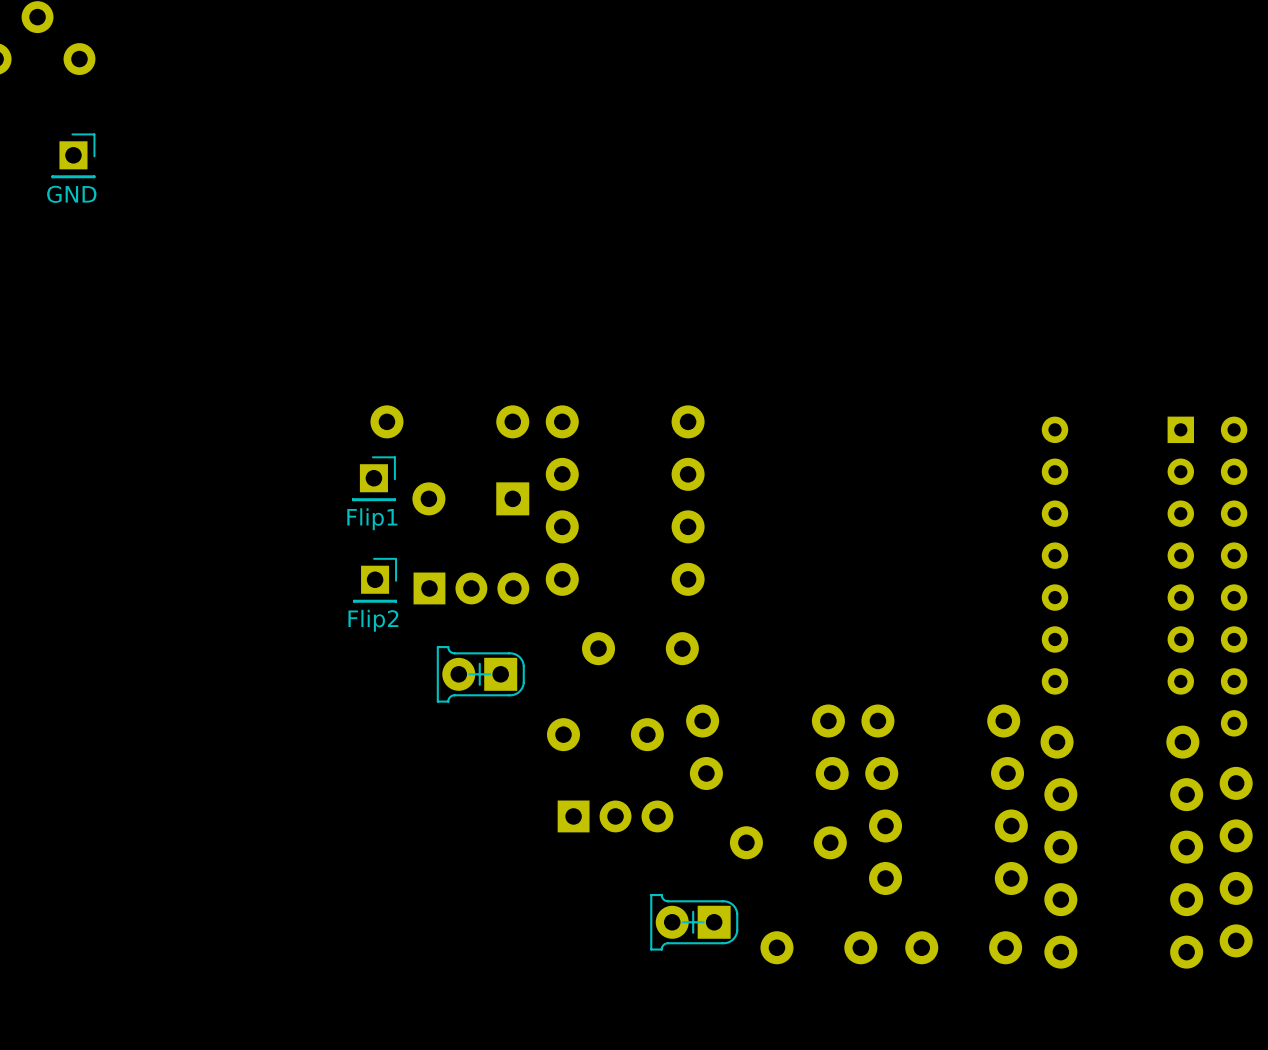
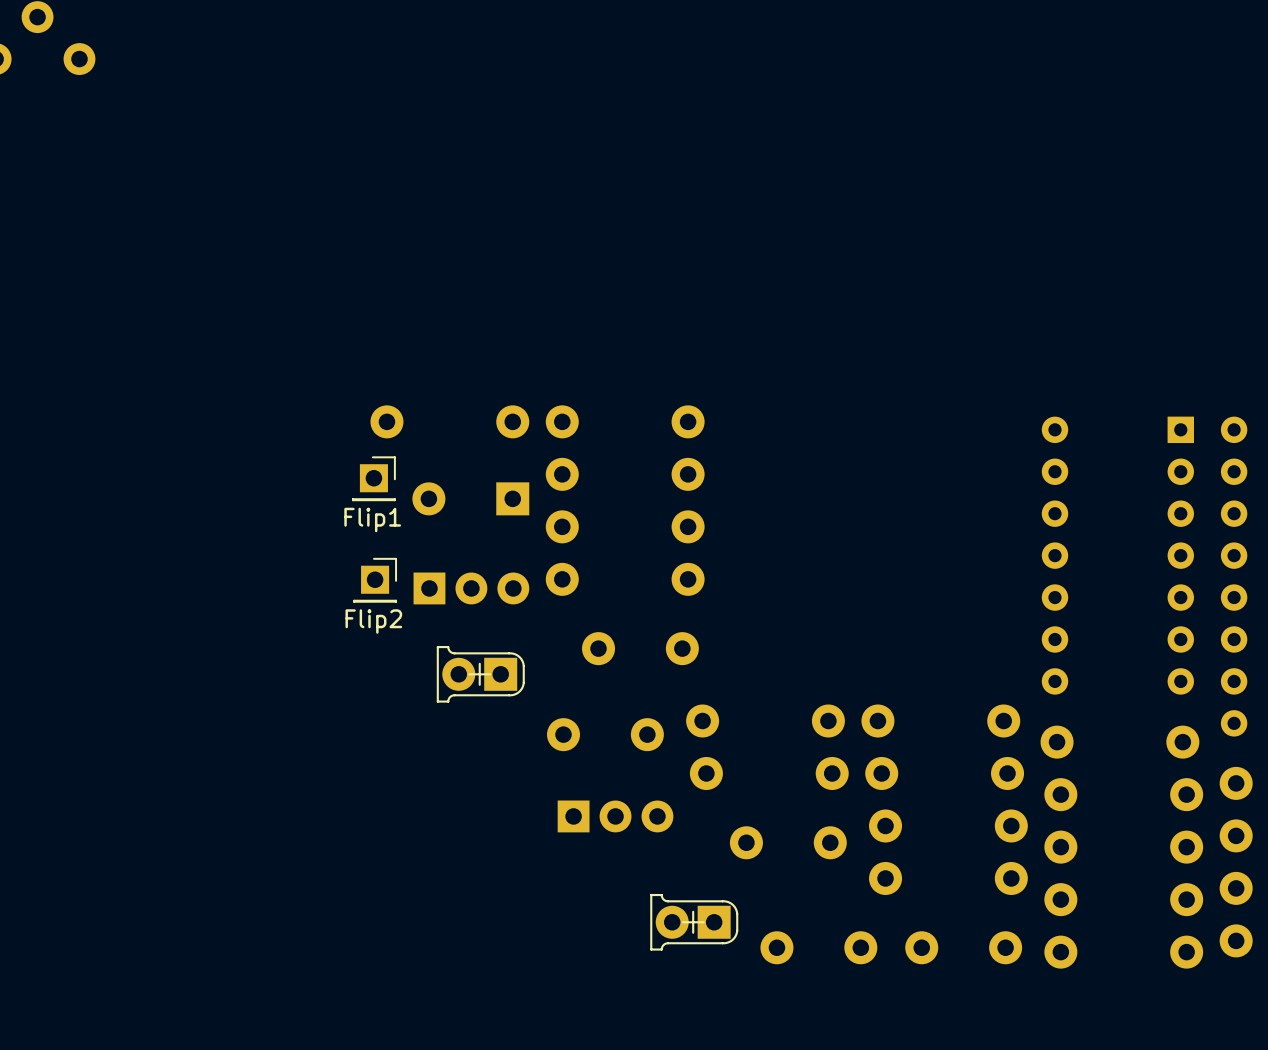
part: GND (73, 155) -> none

